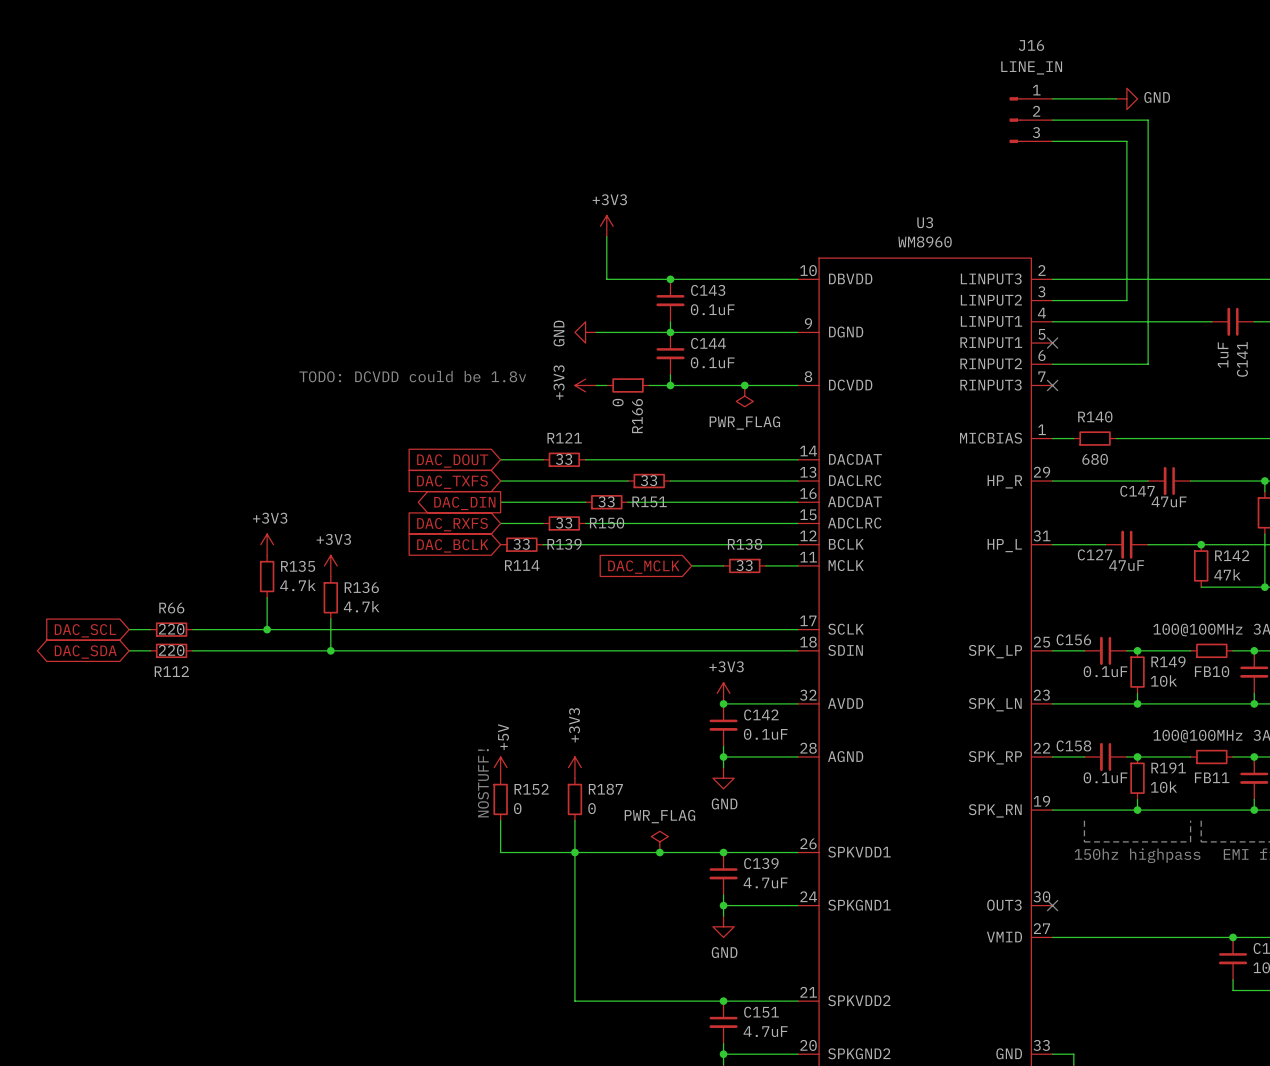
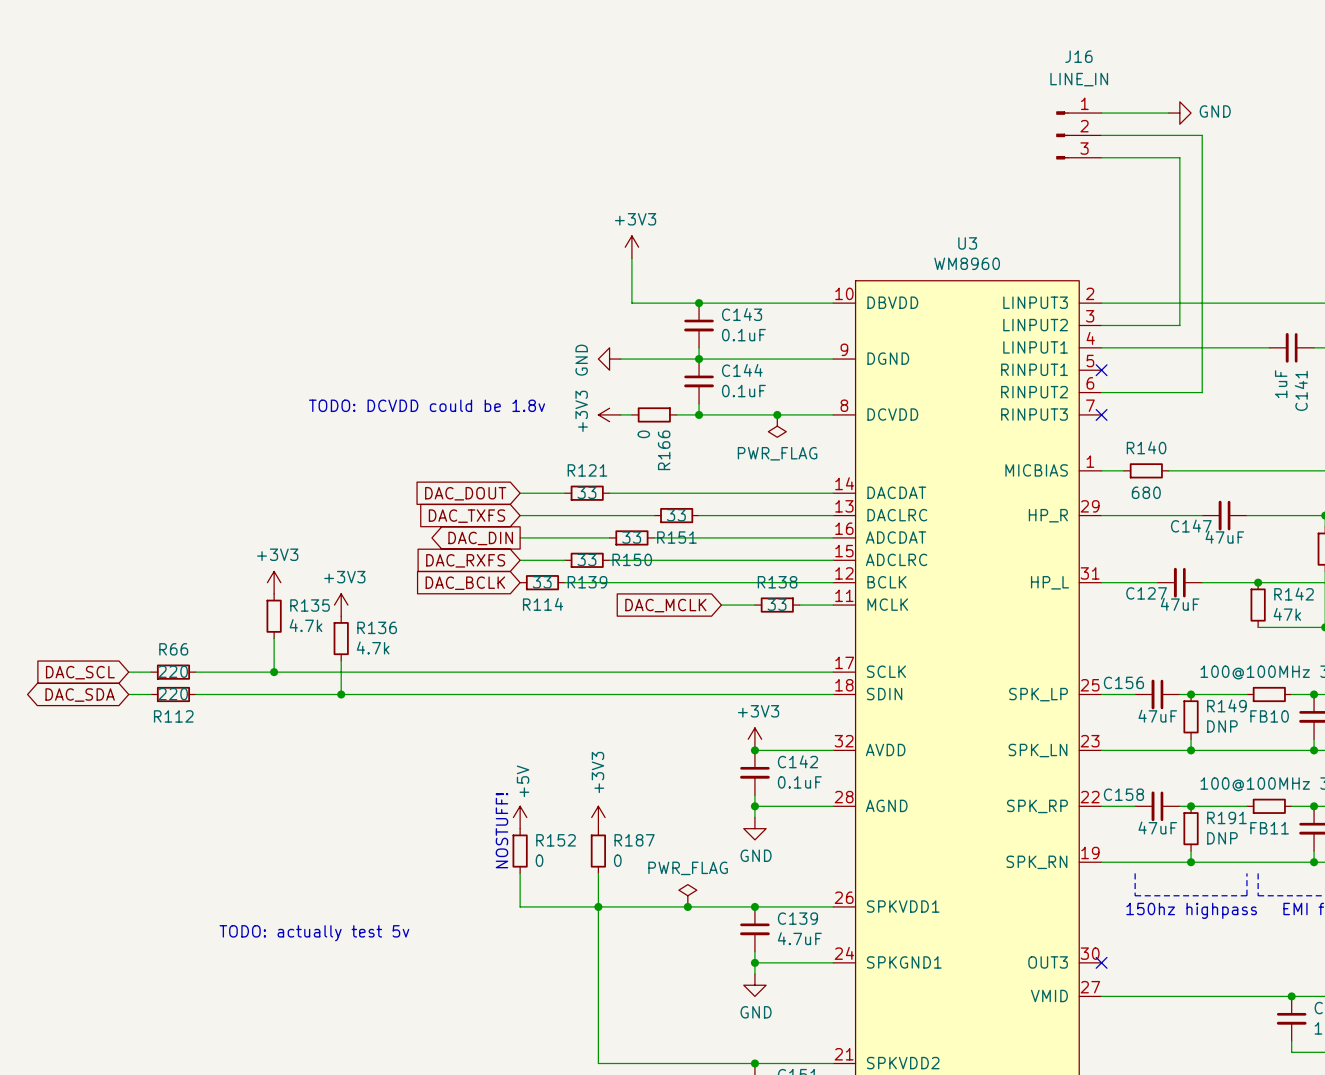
C156 value: 0.1uF (1105, 671) -> 47uF (1157, 716)
R149 value: 10k (1163, 681) -> DNP (1222, 726)
C158 value: 0.1uF (1105, 777) -> 47uF (1157, 827)
R191 value: 10k (1163, 787) -> DNP (1222, 838)
text: none -> TODO: actually test 5v (314, 933)

